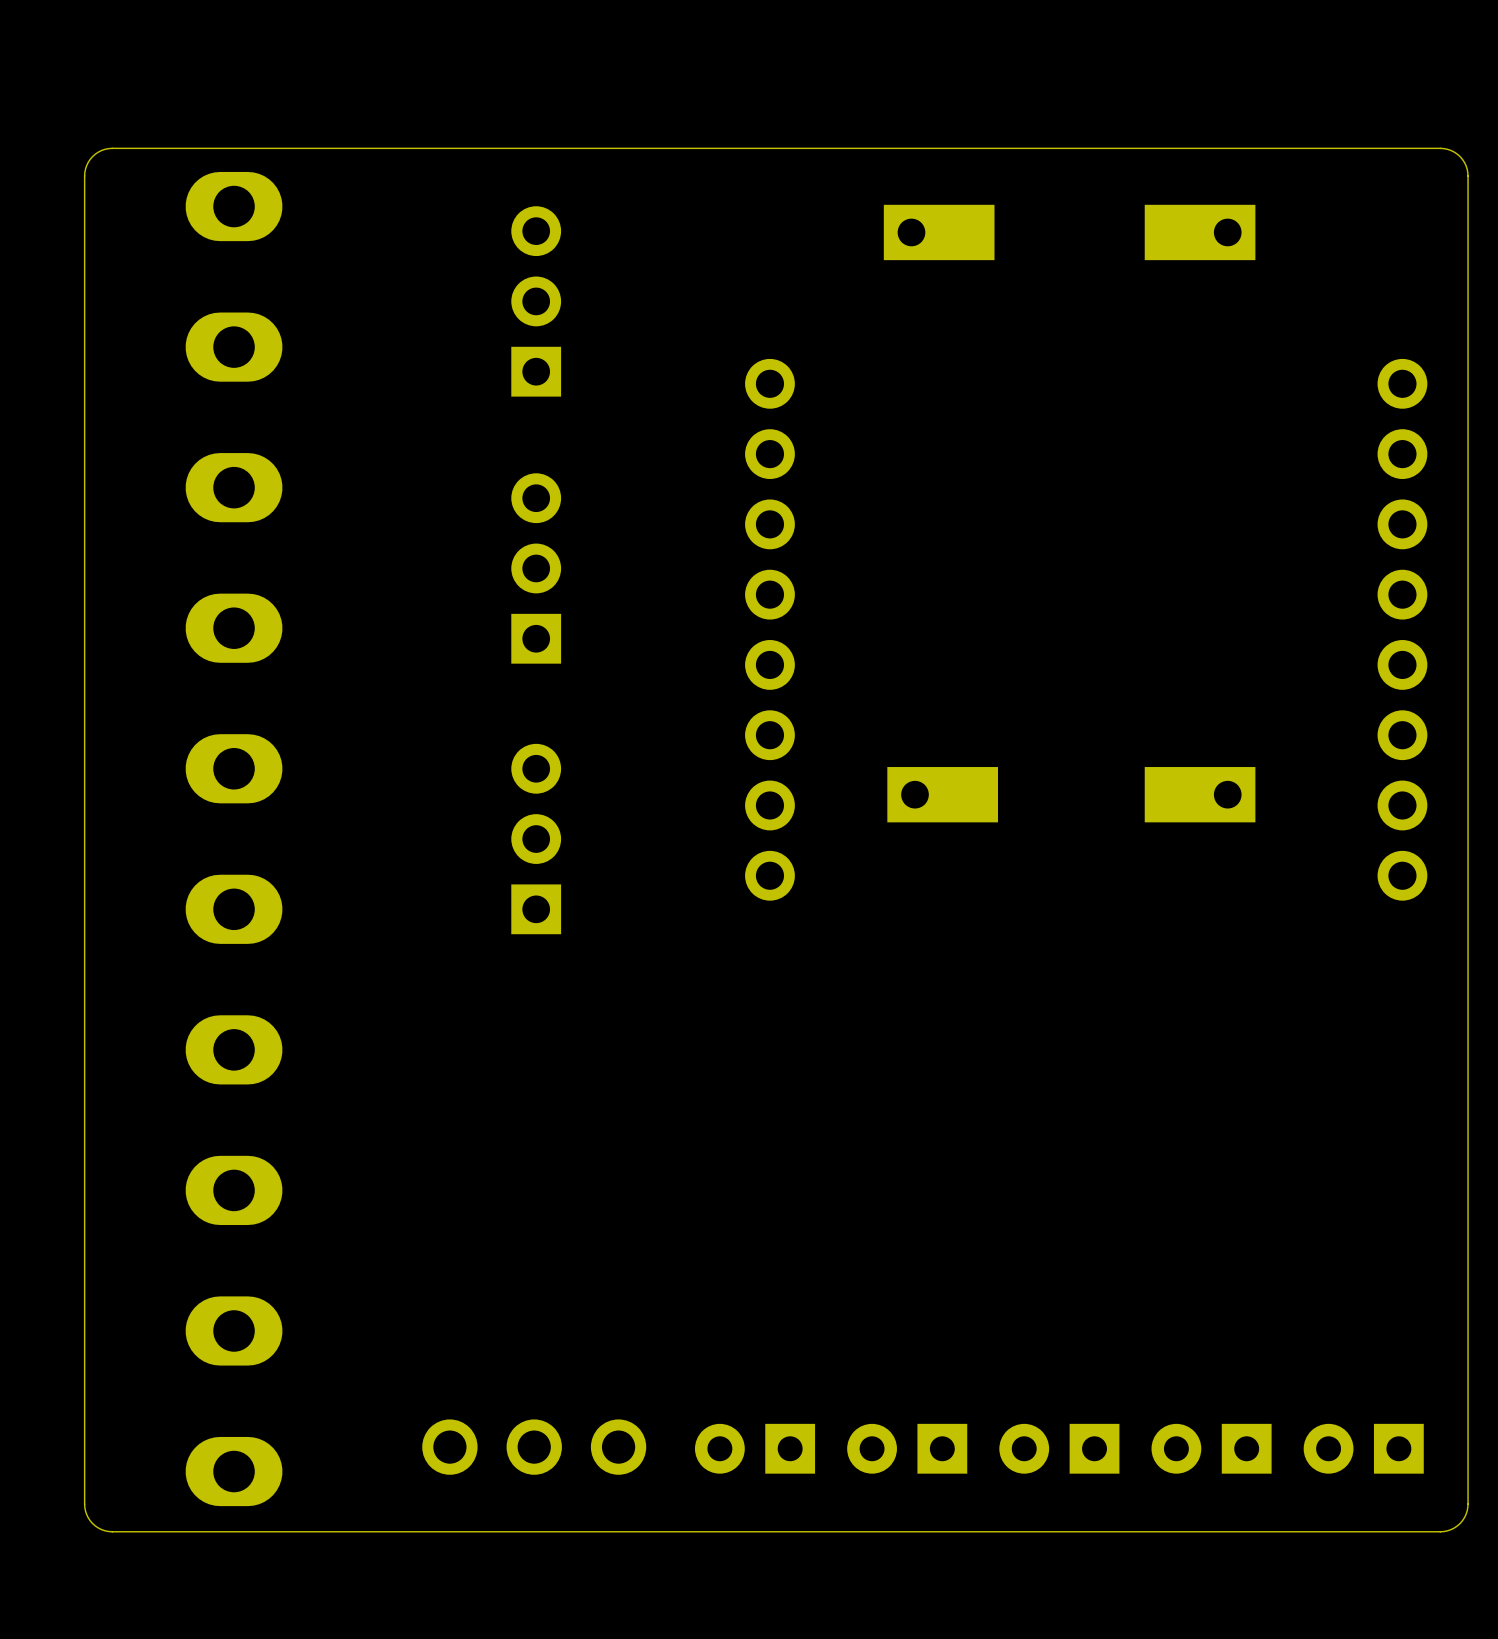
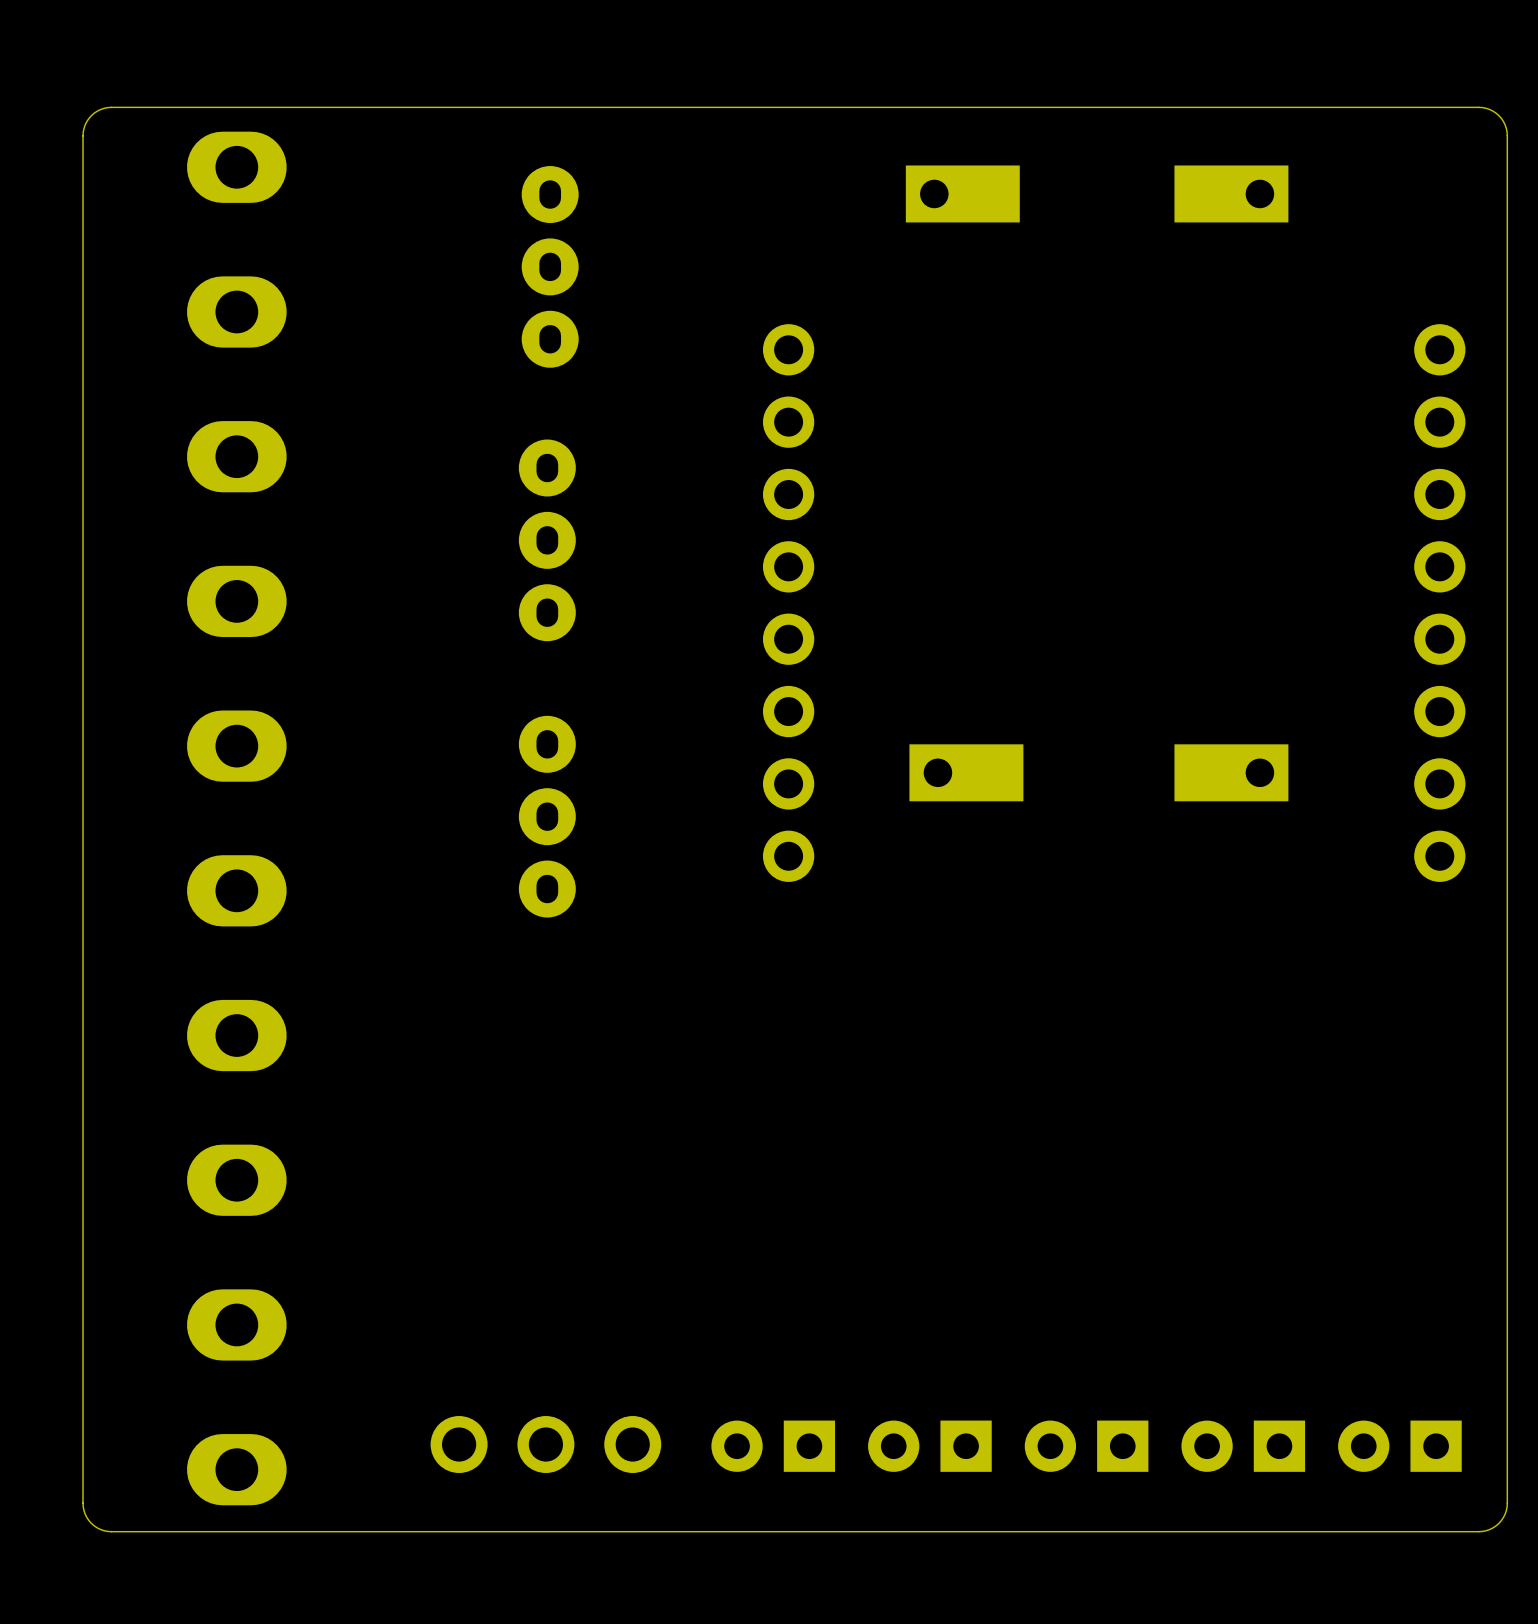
part footprint: [511, 206, 562, 397] -> [521, 166, 579, 368]
part footprint: [511, 473, 562, 664] -> [518, 439, 576, 642]
part footprint: [511, 743, 562, 935] -> [518, 715, 576, 918]

